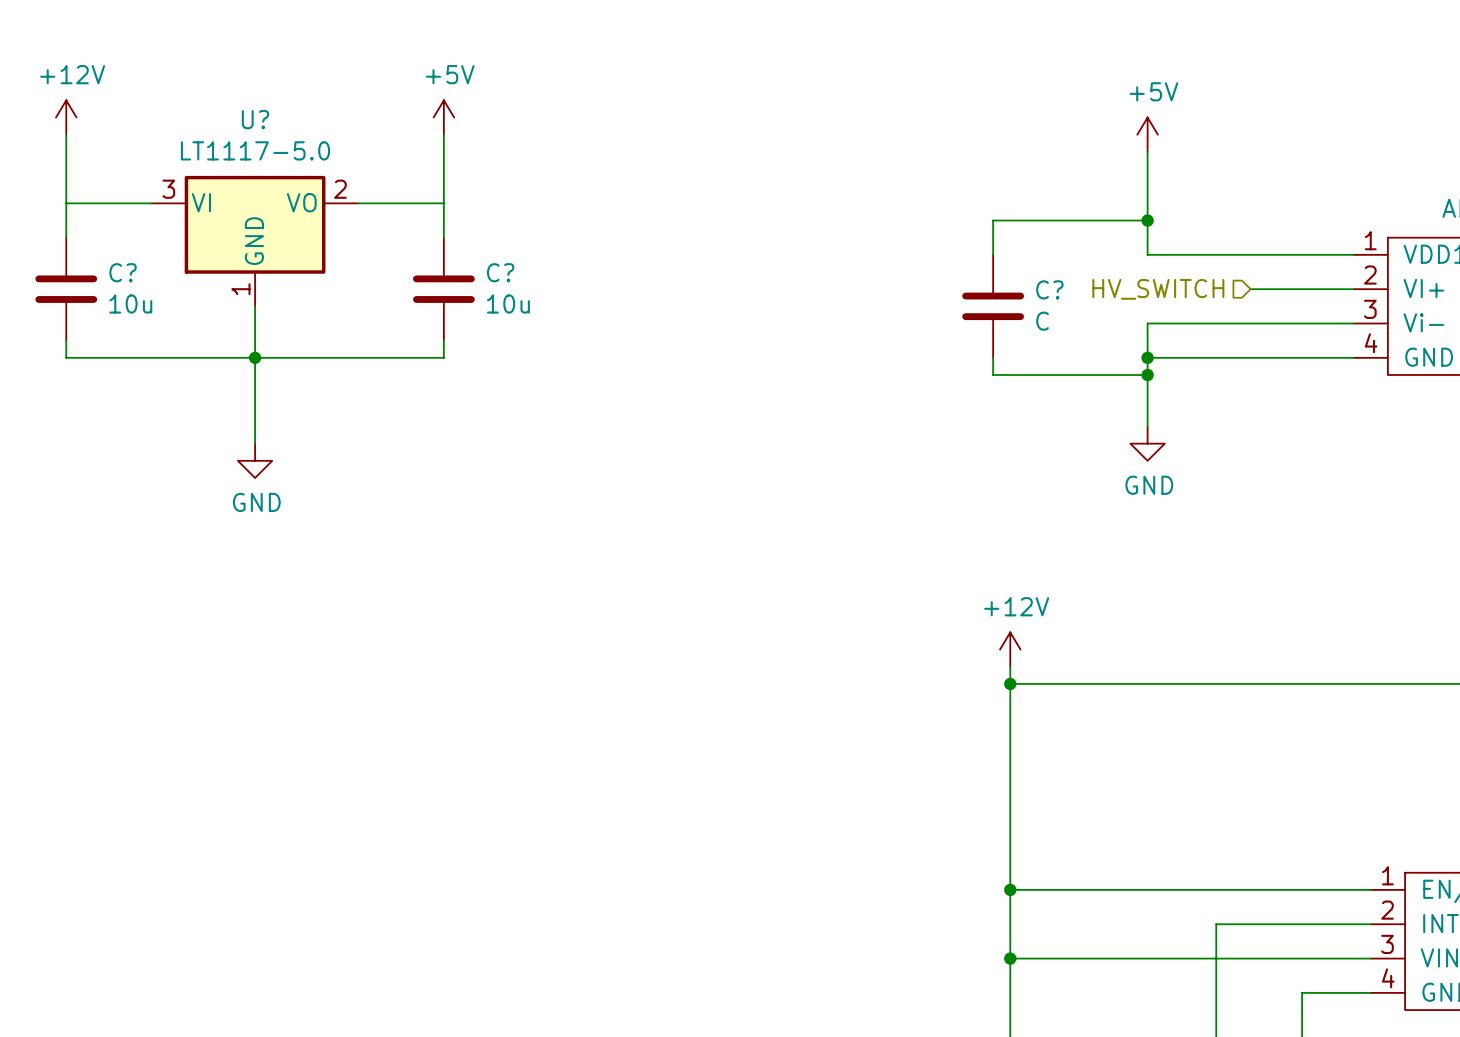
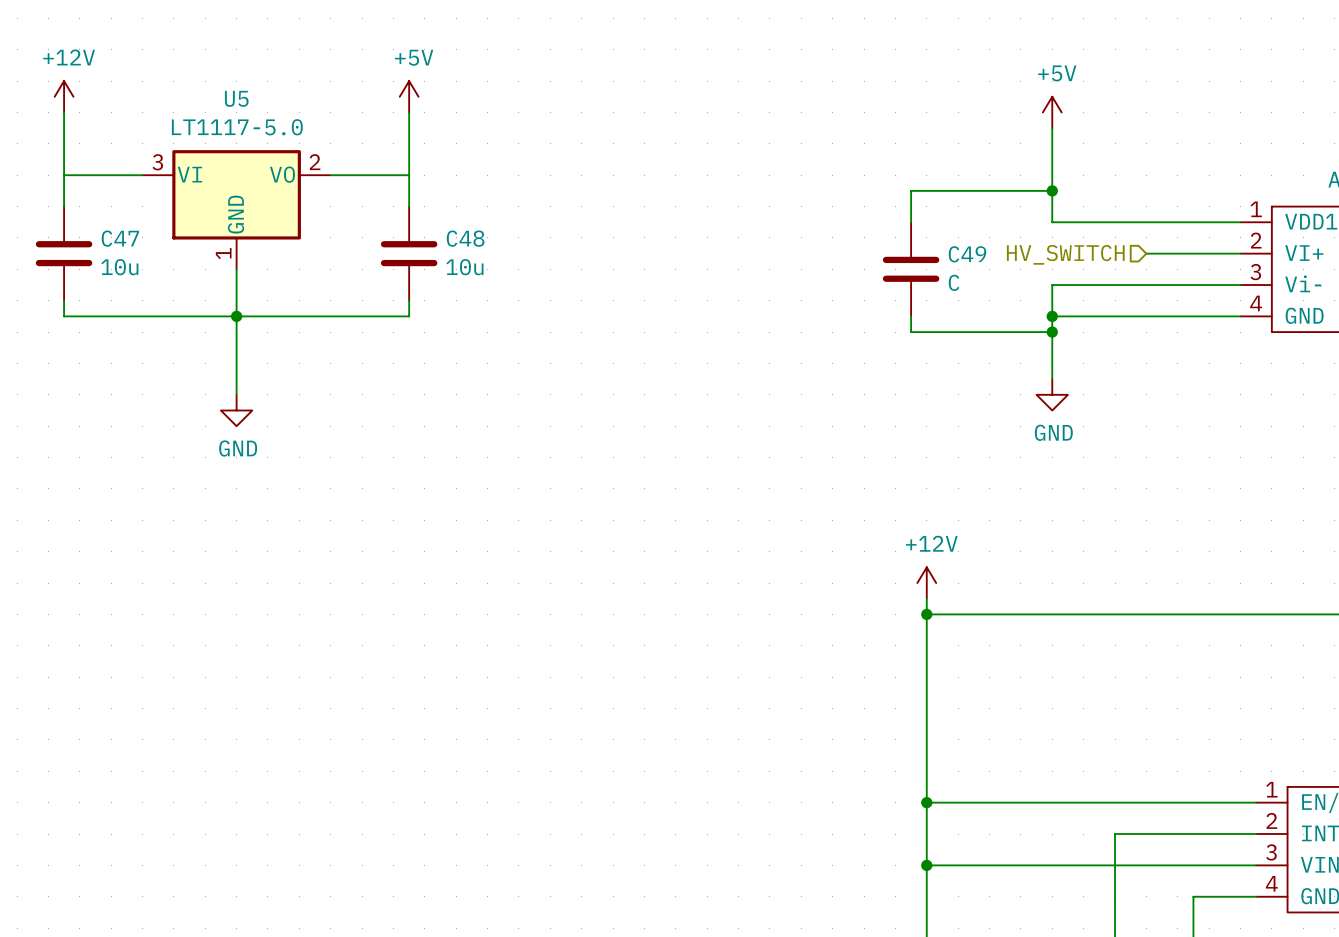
U? name: U? (255, 119) -> U5 (236, 98)
C? name: C? (123, 272) -> C47 (120, 238)
C? name: C? (500, 272) -> C48 (465, 238)
C? name: C? (1049, 289) -> C49 (967, 254)

